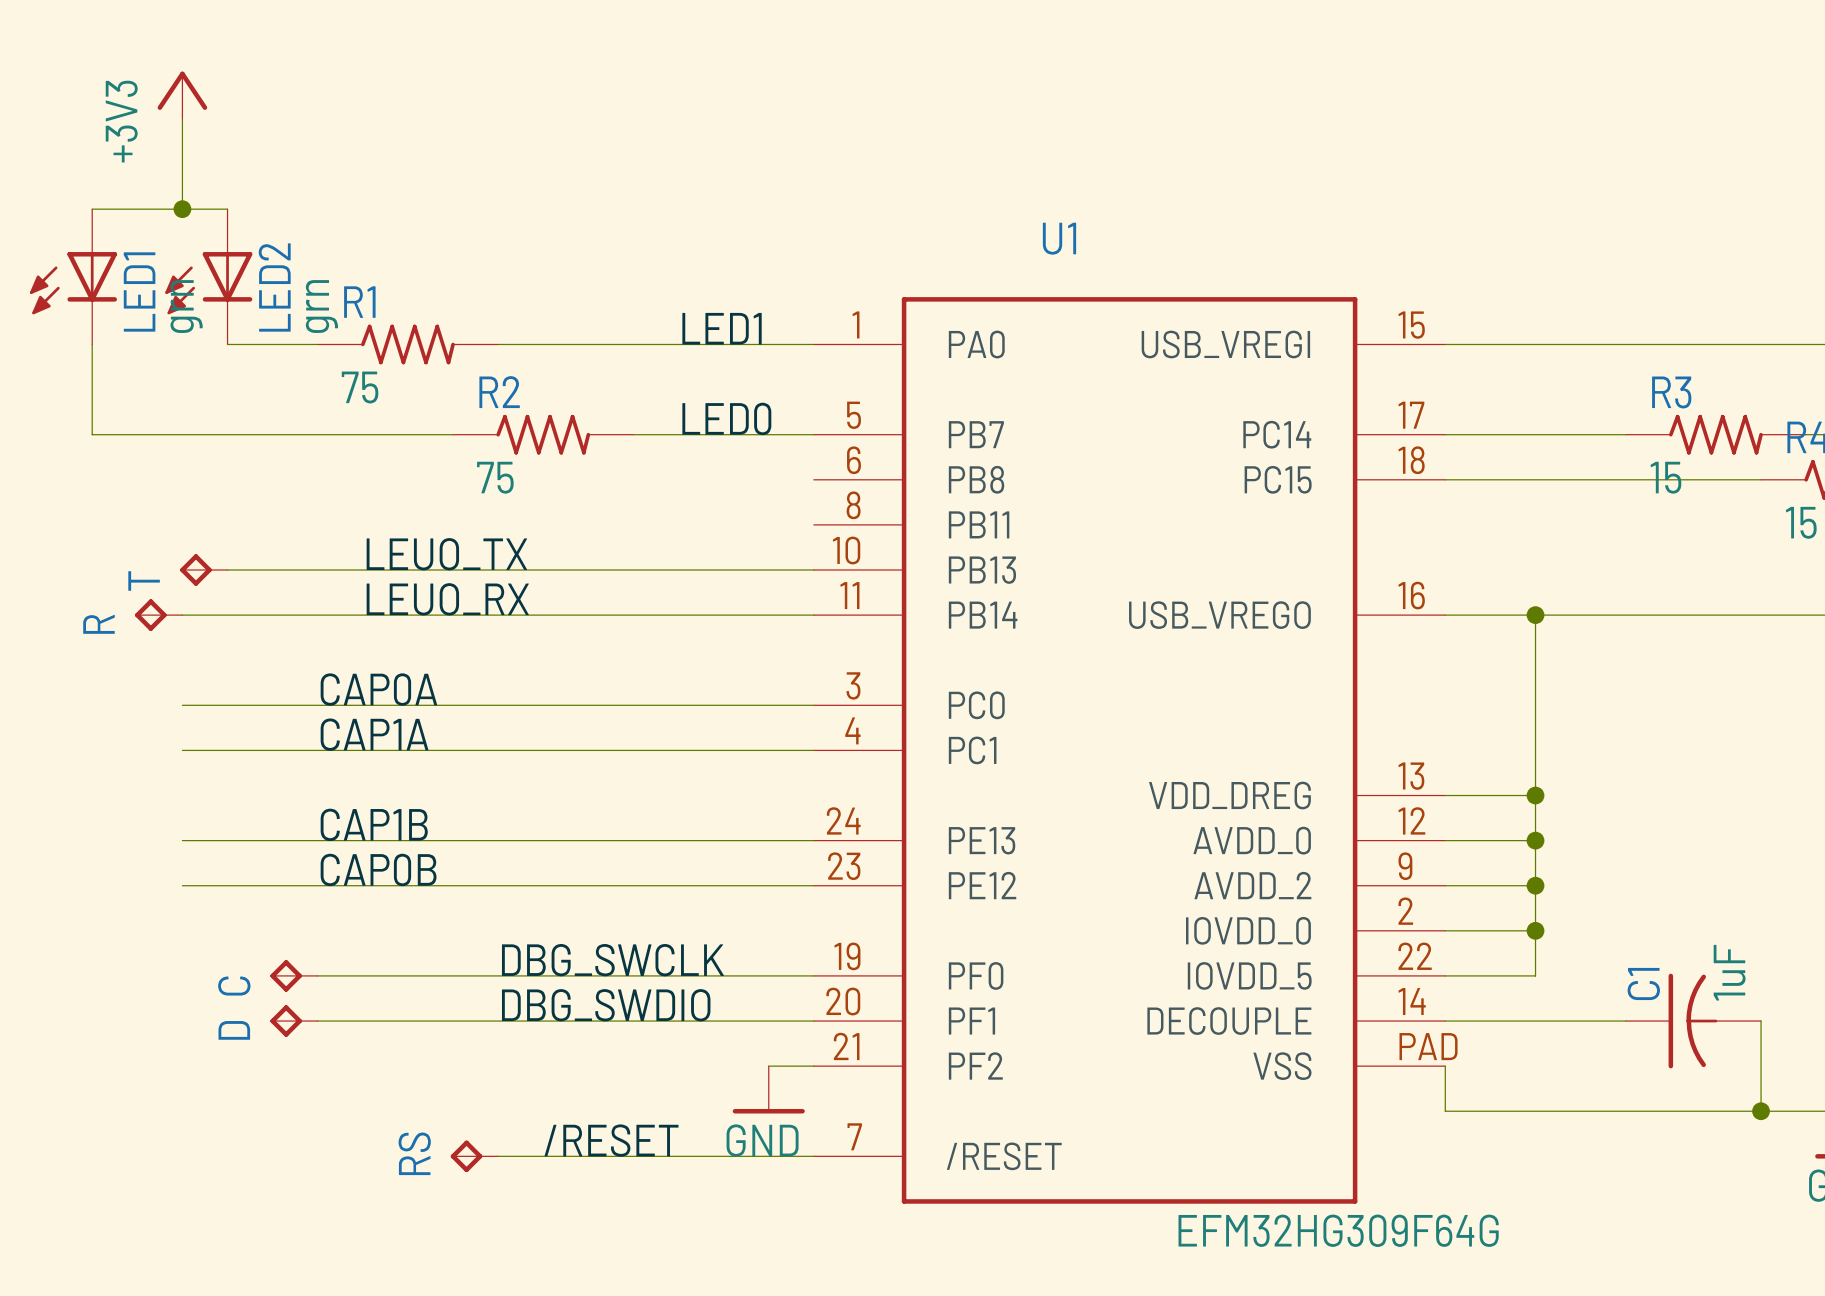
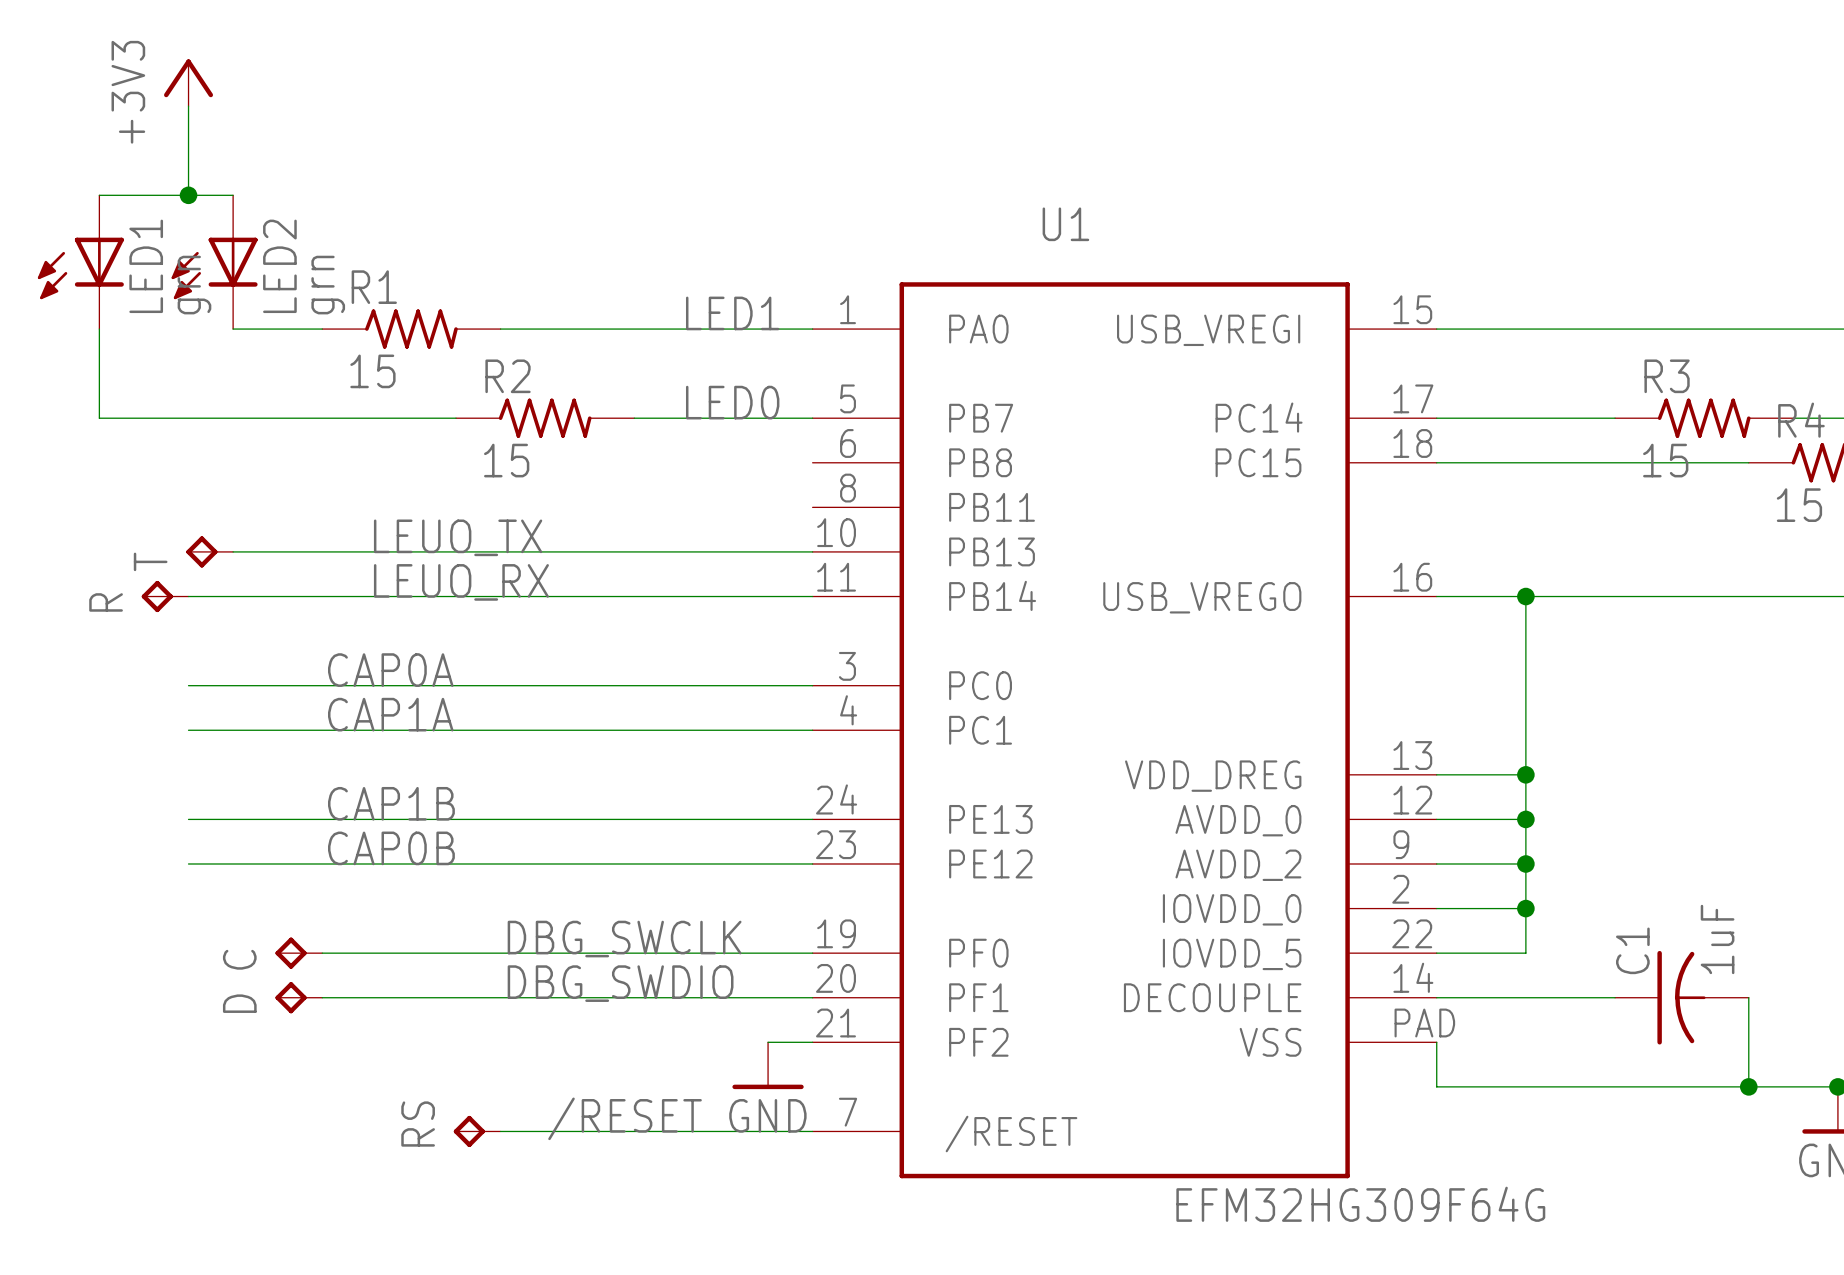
R1 value: 75 (360, 387) -> 15 (372, 371)
R2 value: 75 (495, 477) -> 15 (506, 460)

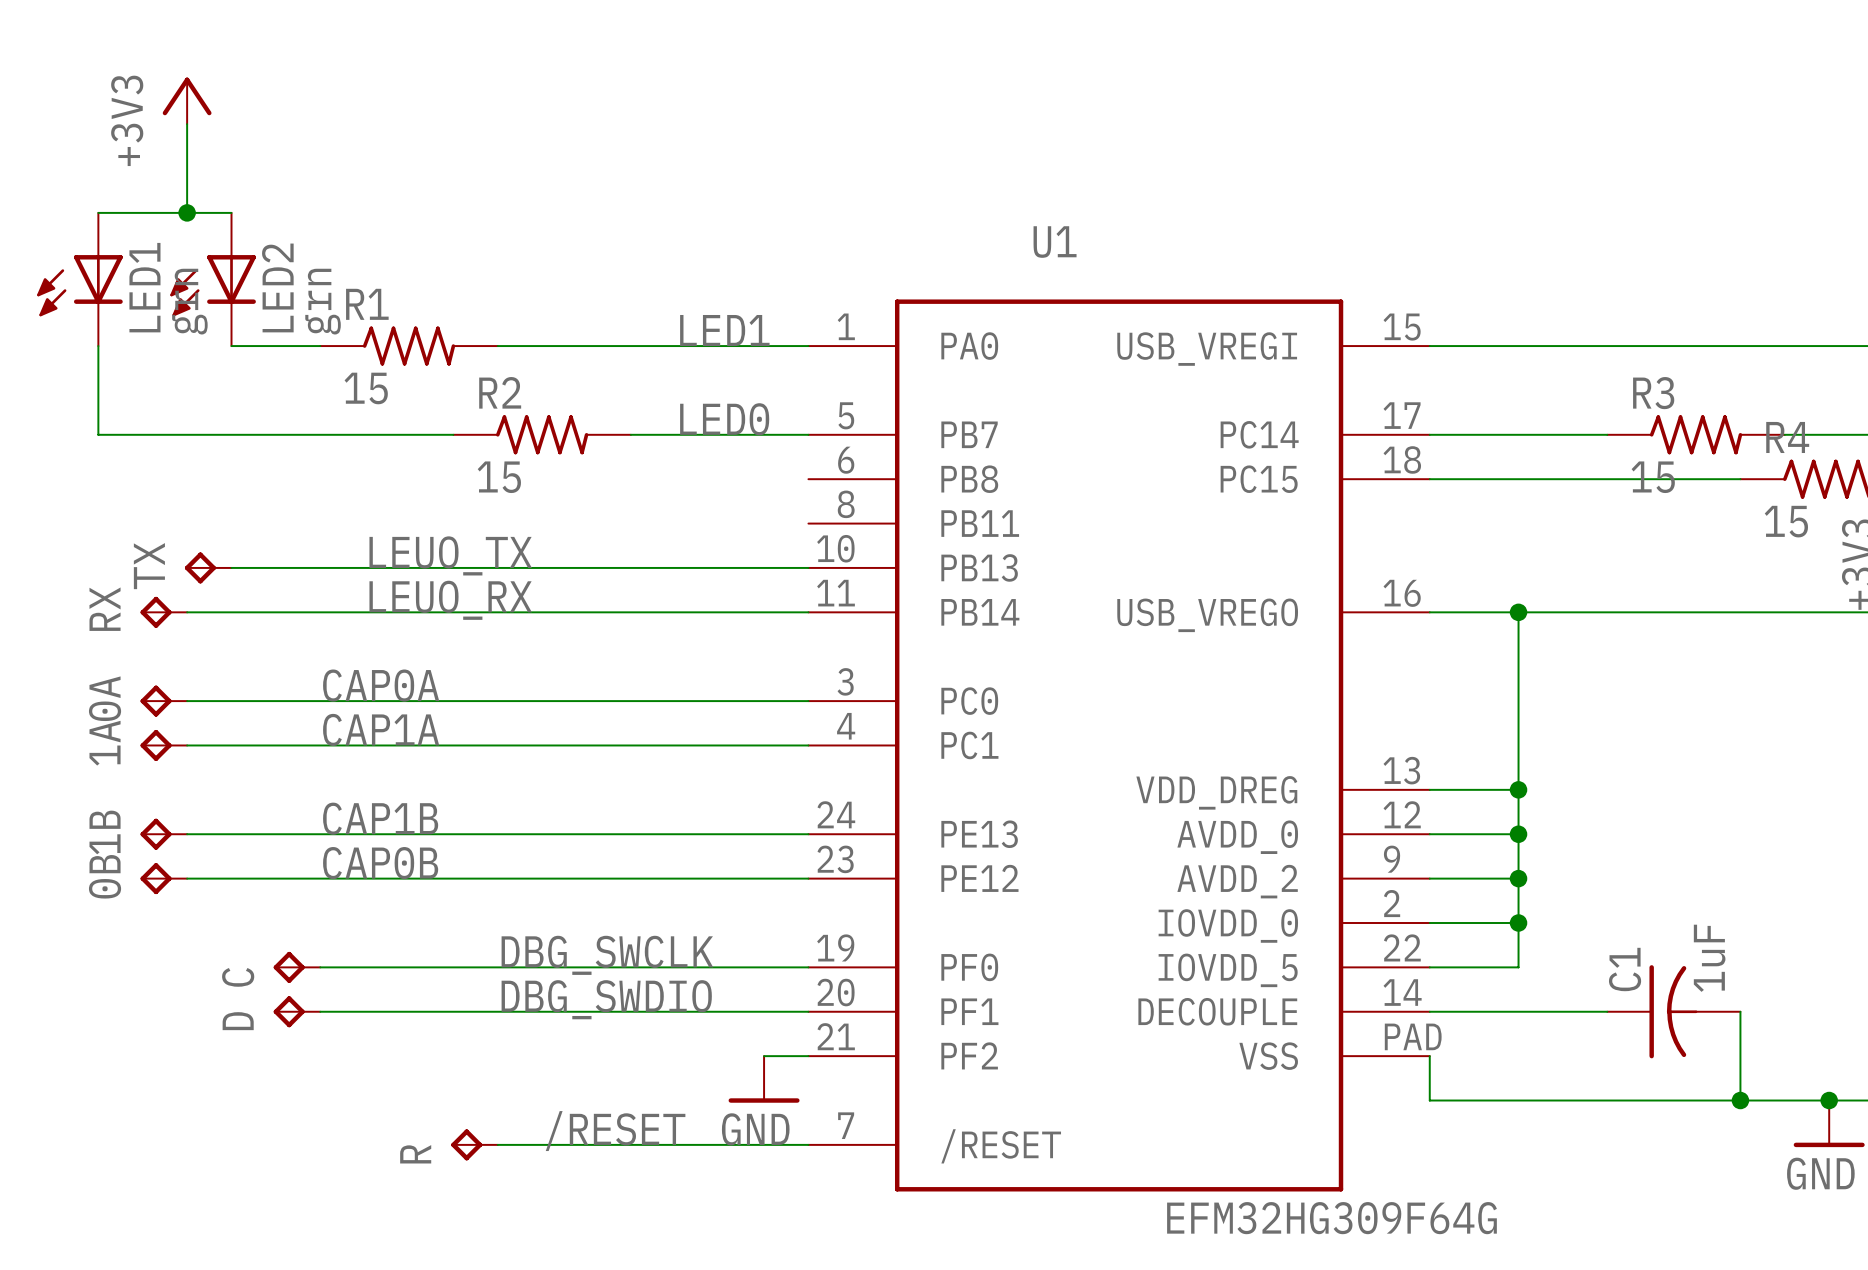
T name: T (150, 561) -> TX (149, 566)
R name: R (106, 602) -> RX (105, 609)
0A: none -> (163, 701)
1A: none -> (163, 745)
1B: none -> (163, 834)
0B: none -> (163, 878)
RS name: RS (418, 1124) -> R (415, 1154)

